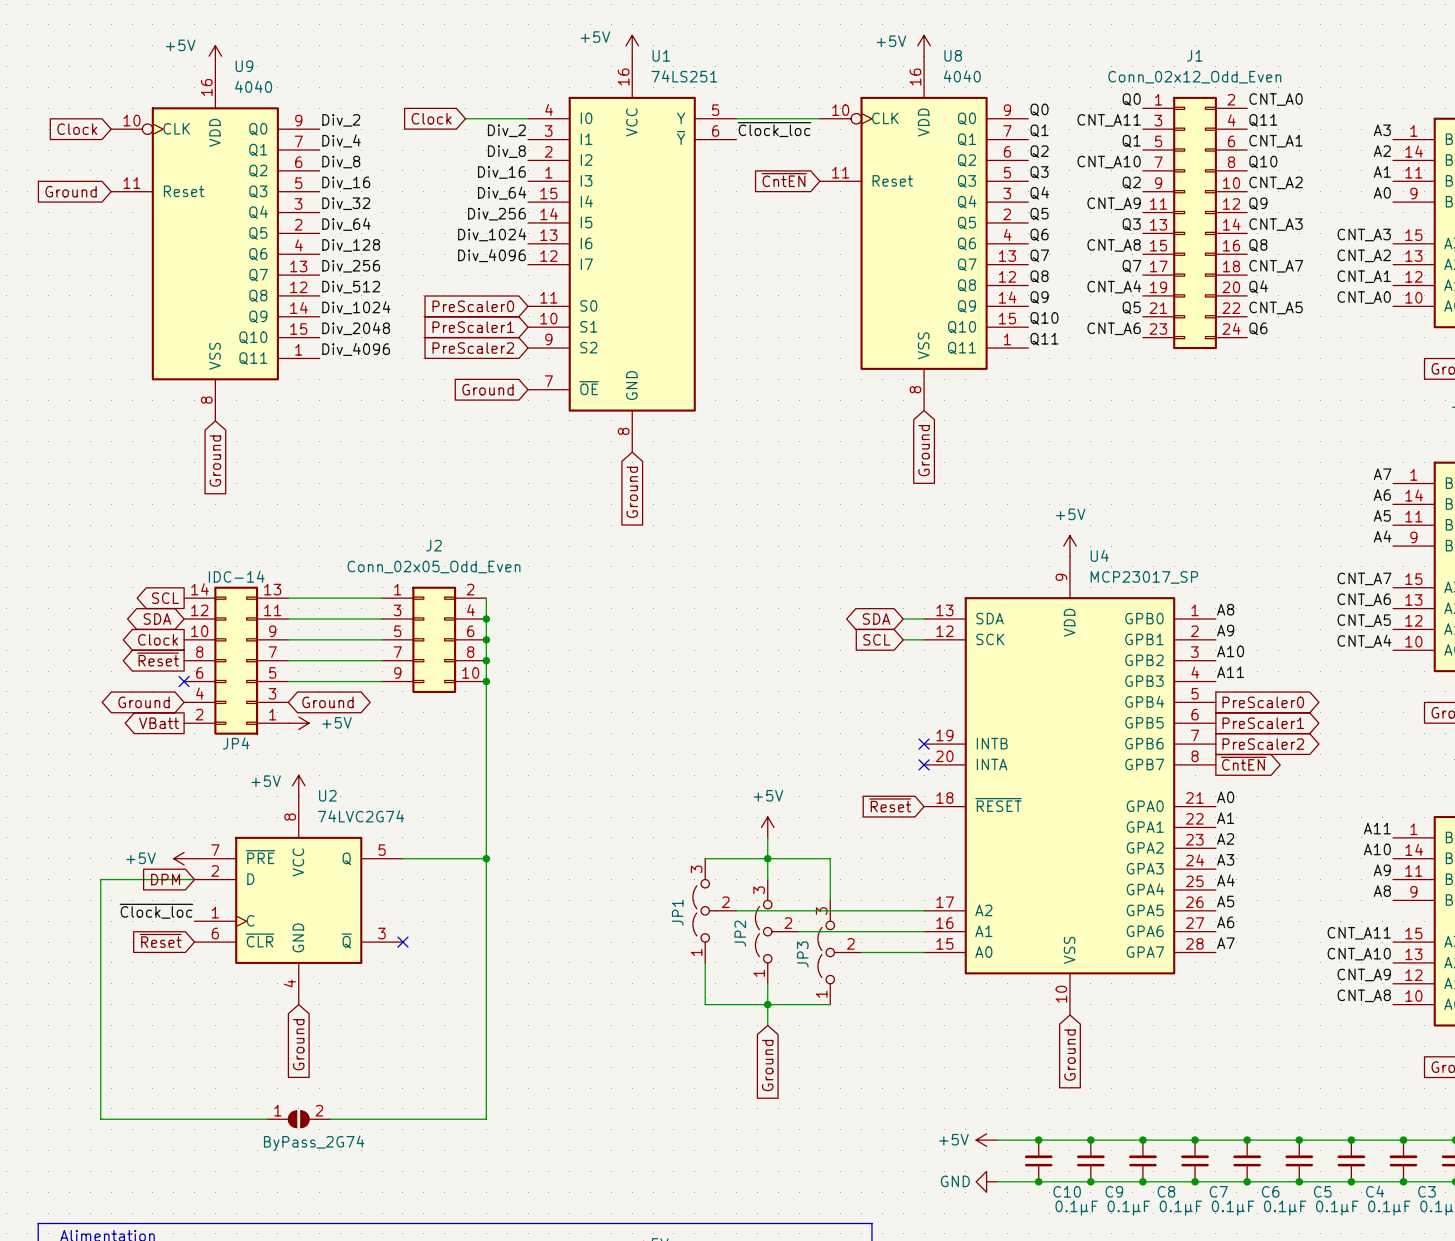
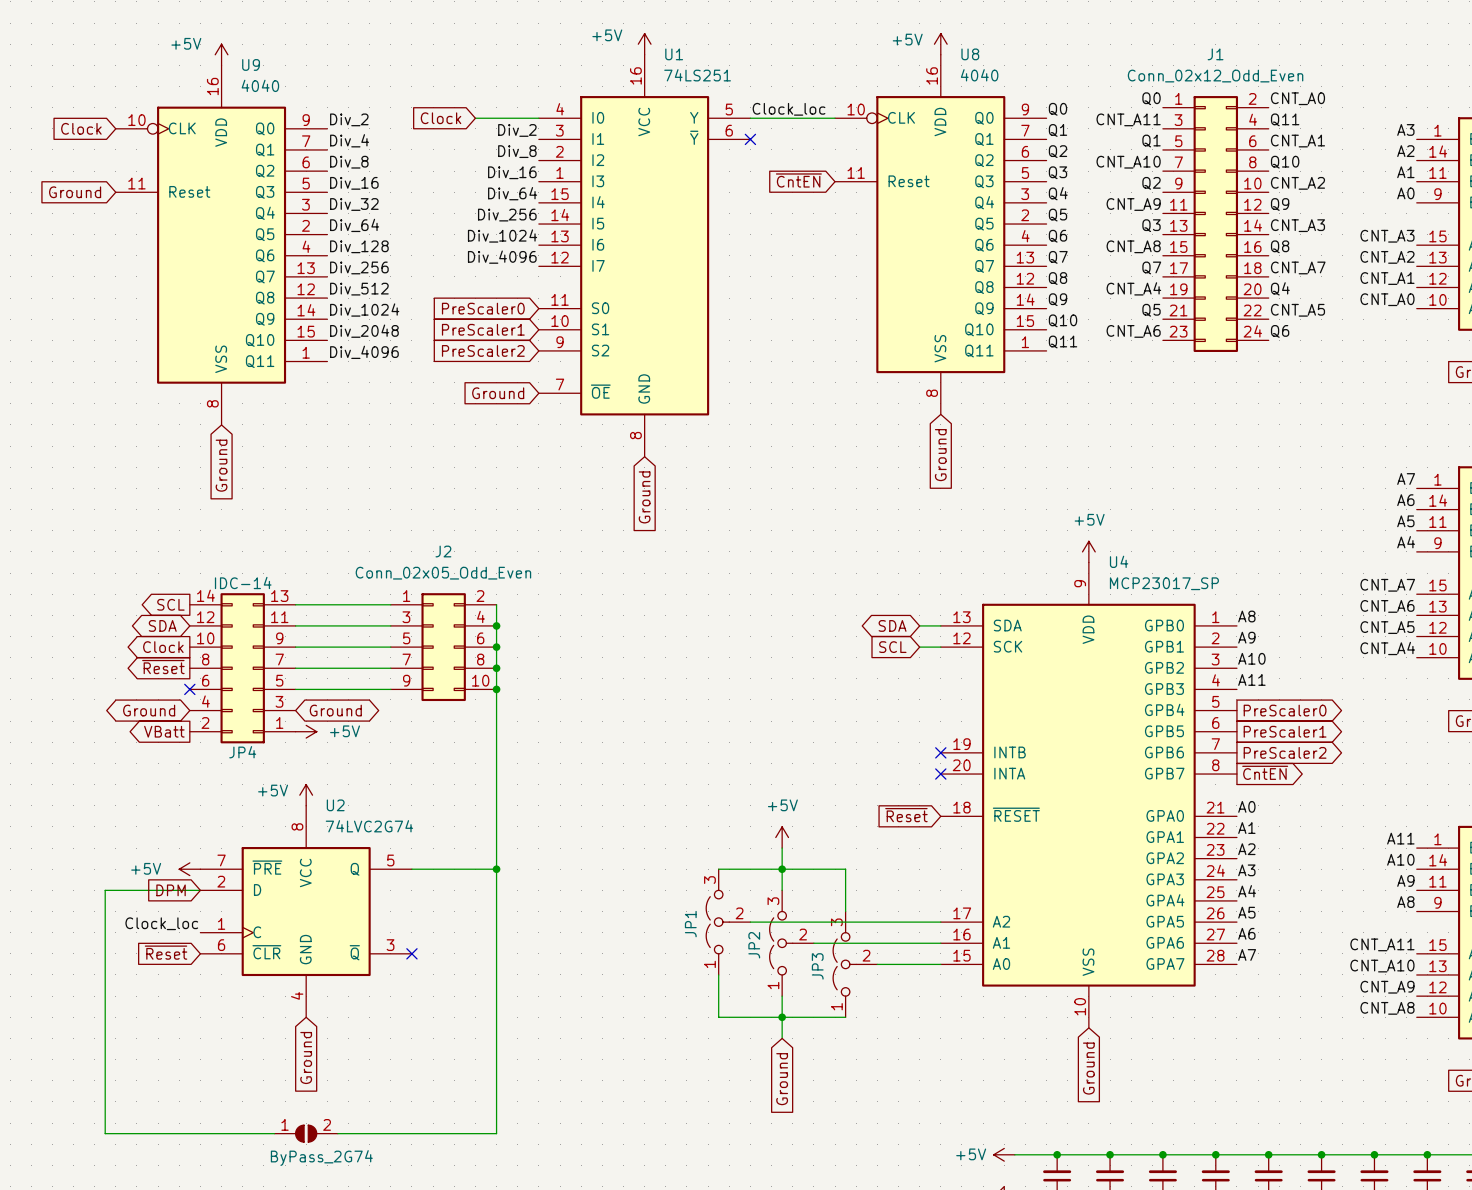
label: ~{Clock_loc} (774, 129) -> Clock_loc (789, 109)
no-connect mark: none -> (750, 139)
label: ~{Clock_loc} (156, 911) -> Clock_loc (161, 923)

